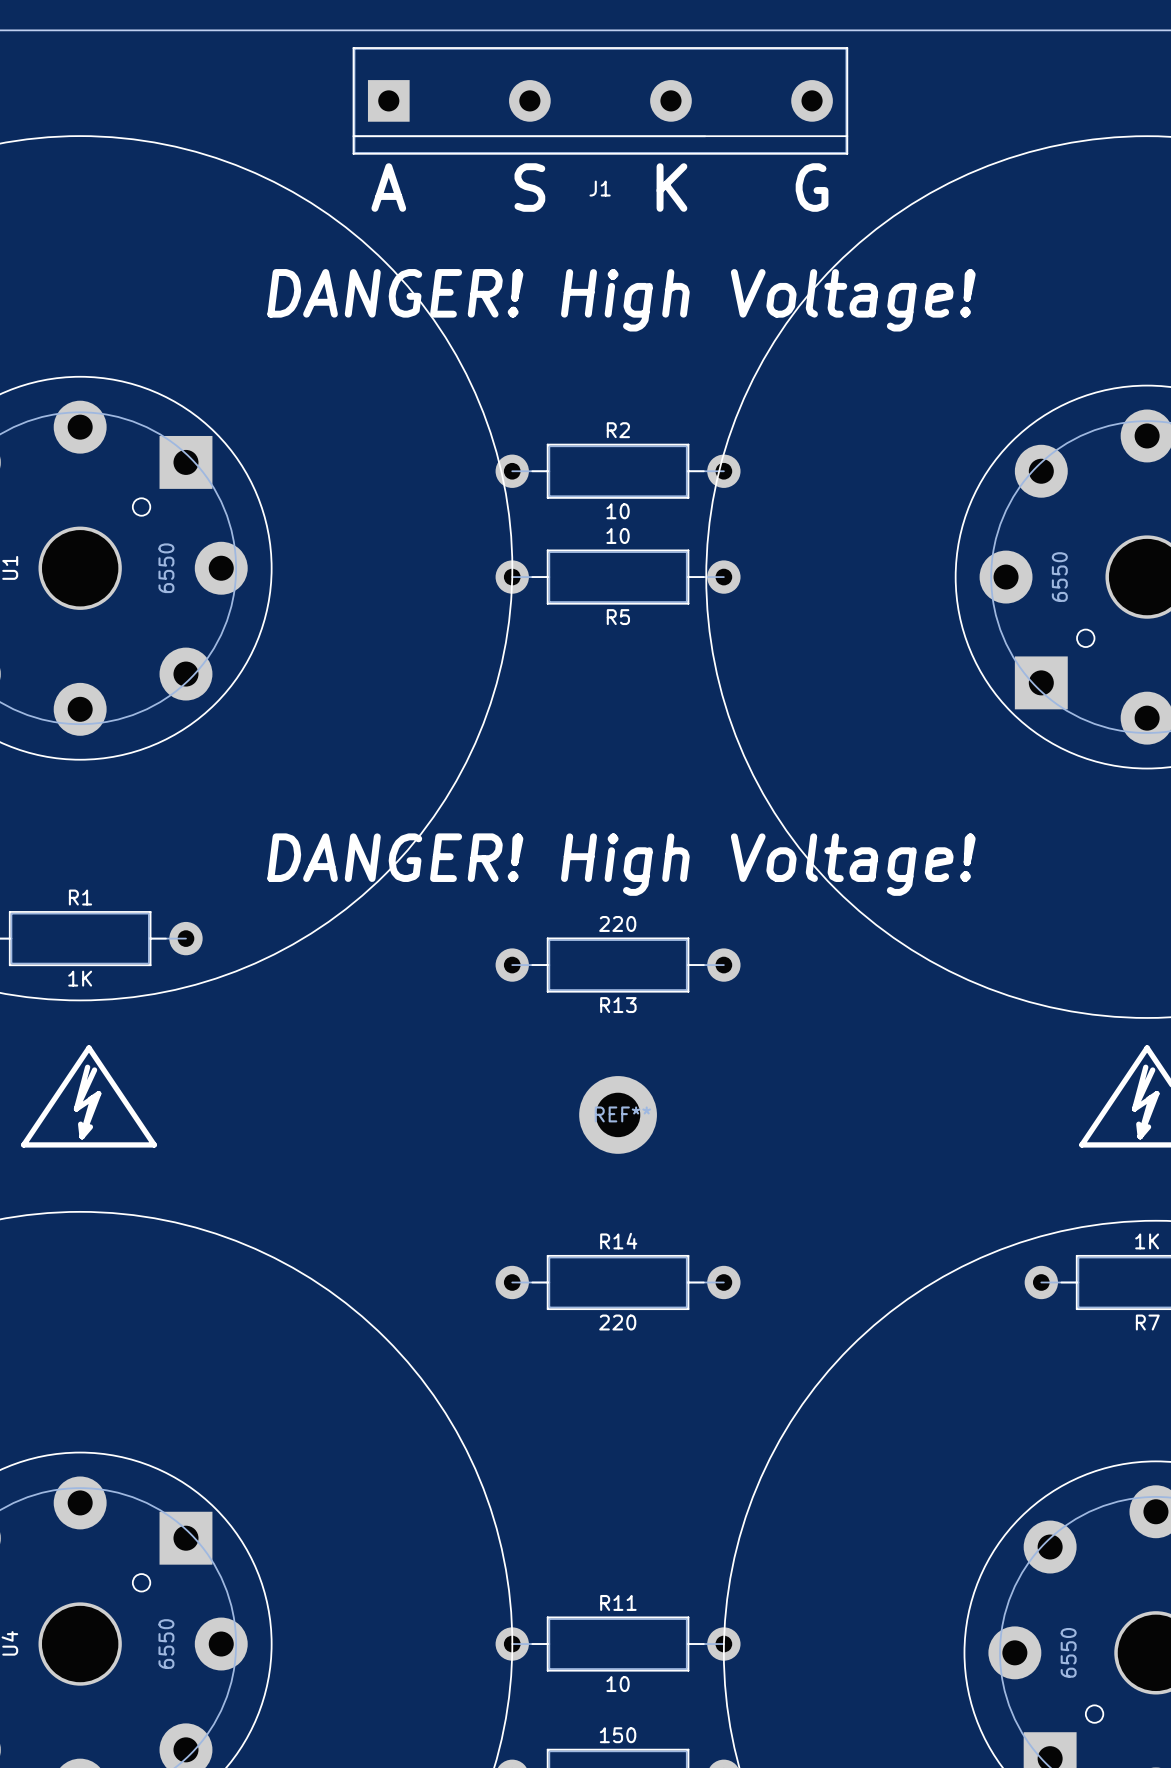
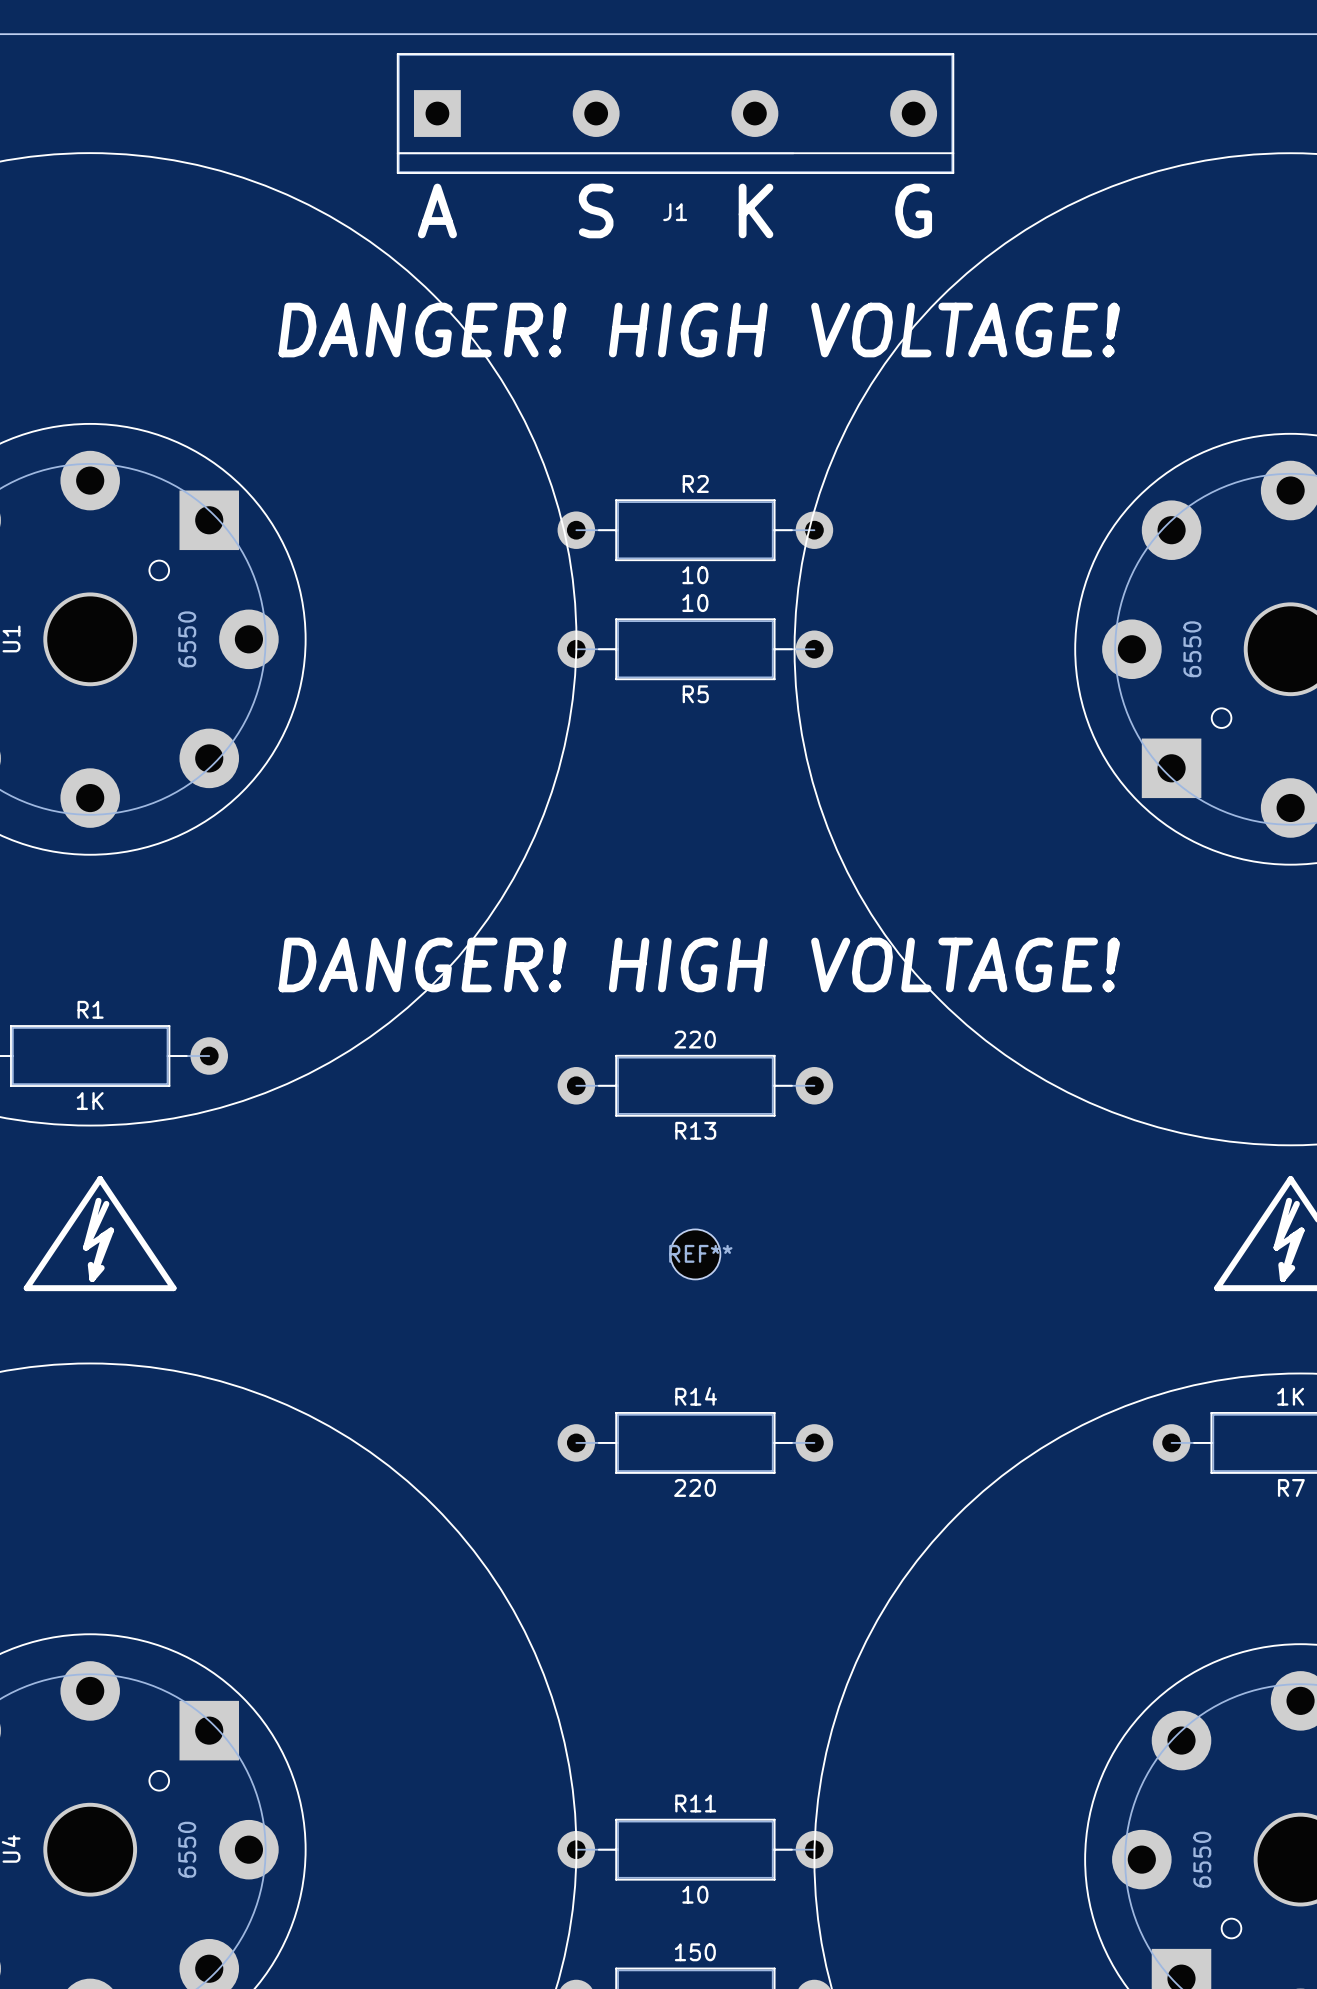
text: DANGER! High Voltage! (621, 300) -> DANGER! HIGH VOLTAGE! (699, 330)
text: DANGER! High Voltage! (621, 864) -> DANGER! HIGH VOLTAGE! (699, 964)
REF** footprint: [579, 1076, 657, 1154] -> [670, 1229, 721, 1280]

